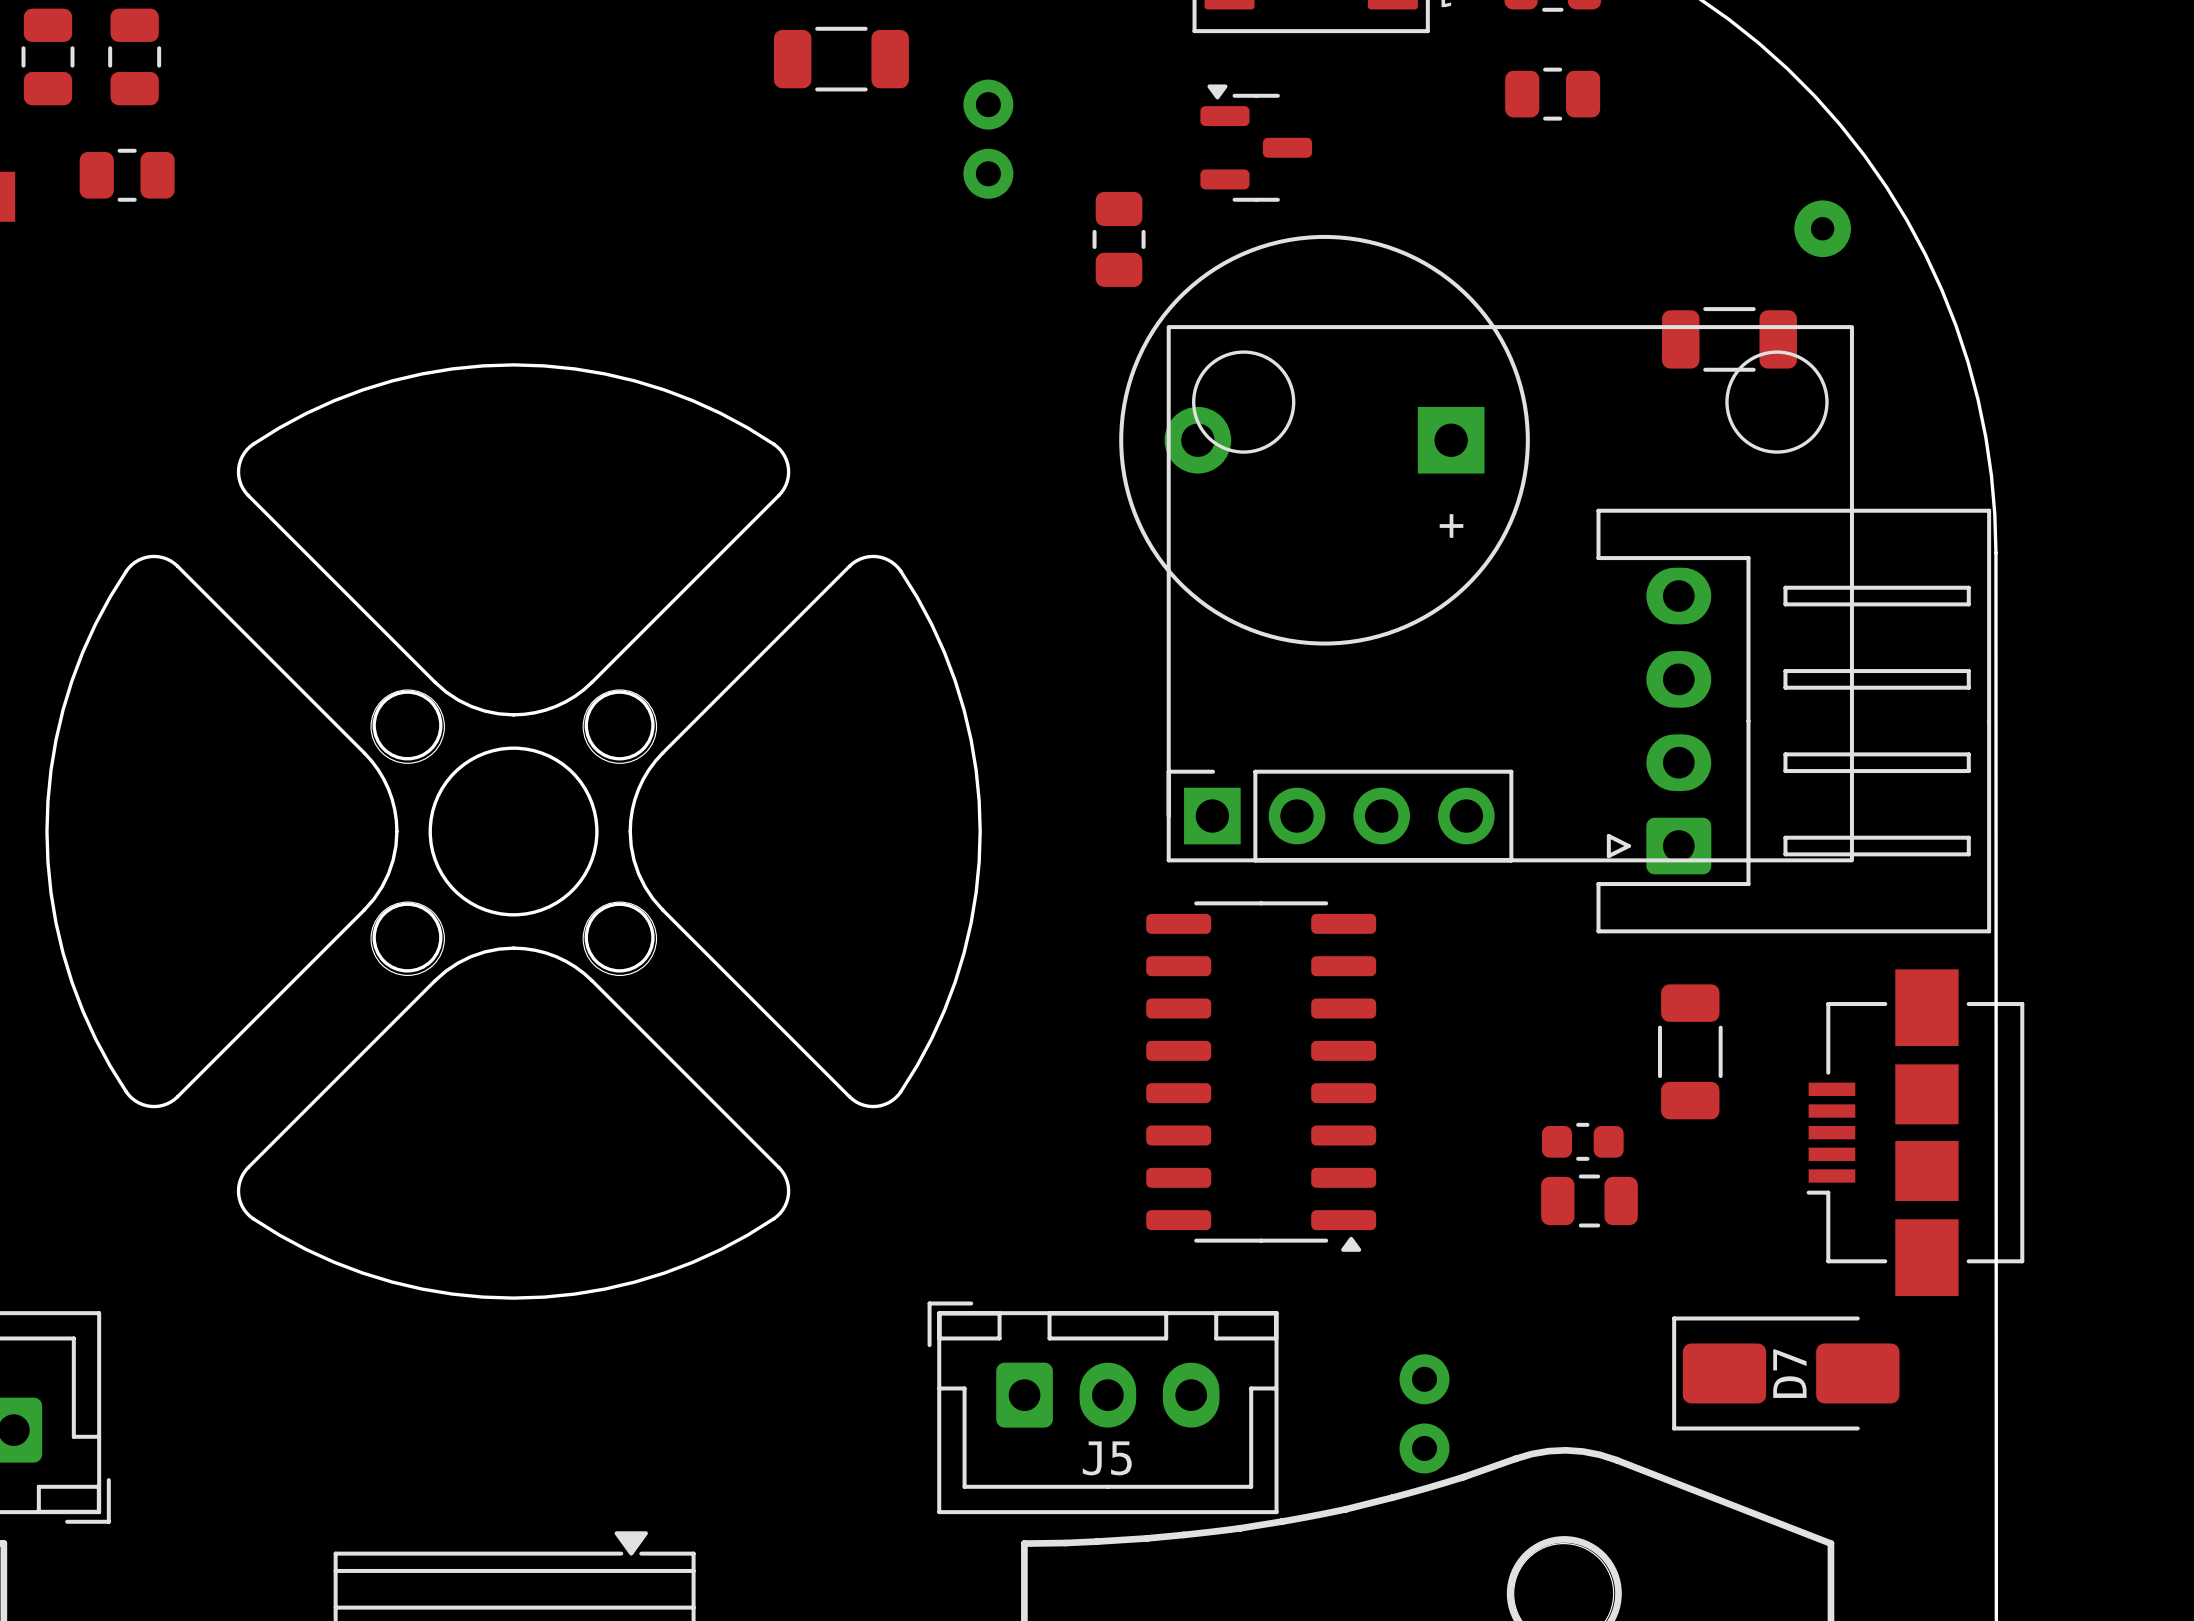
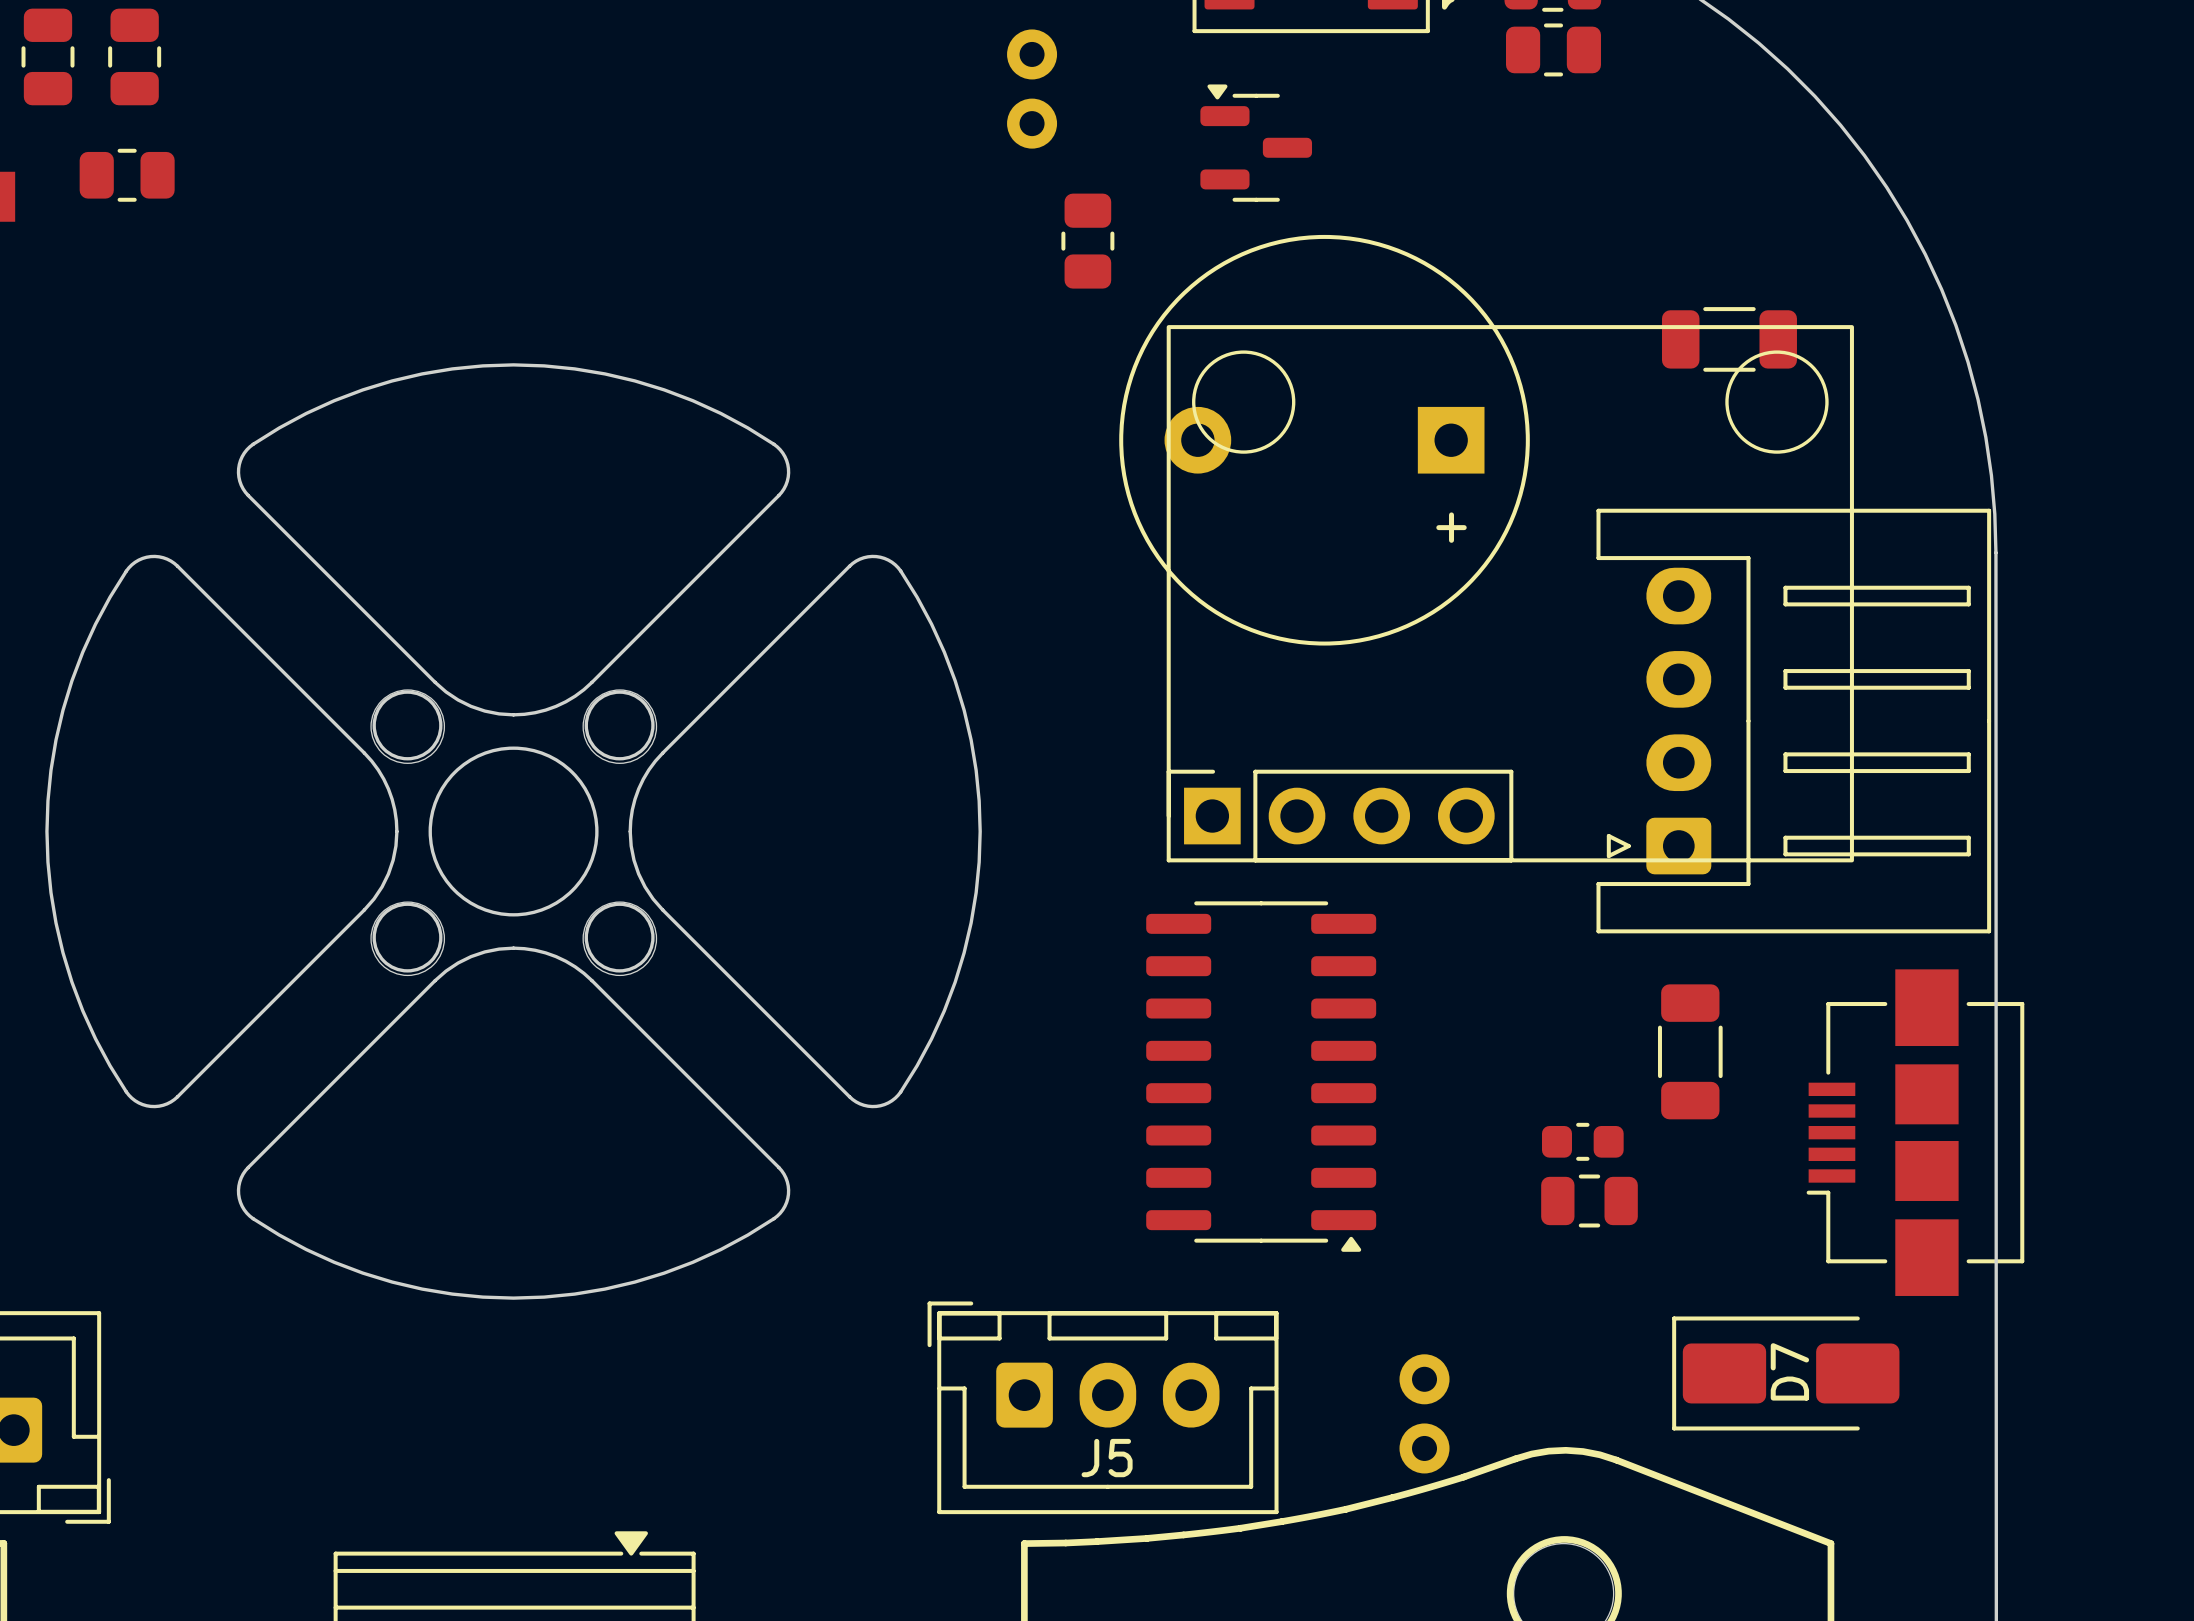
part: none -> (1032, 54)
part: (841, 59) -> none
part position: (1552, 94) -> (1553, 49)
part: (988, 104) -> none
part: none -> (1032, 123)
part: (988, 173) -> none
part: (1822, 228) -> none
part position: (1119, 239) -> (1087, 241)

